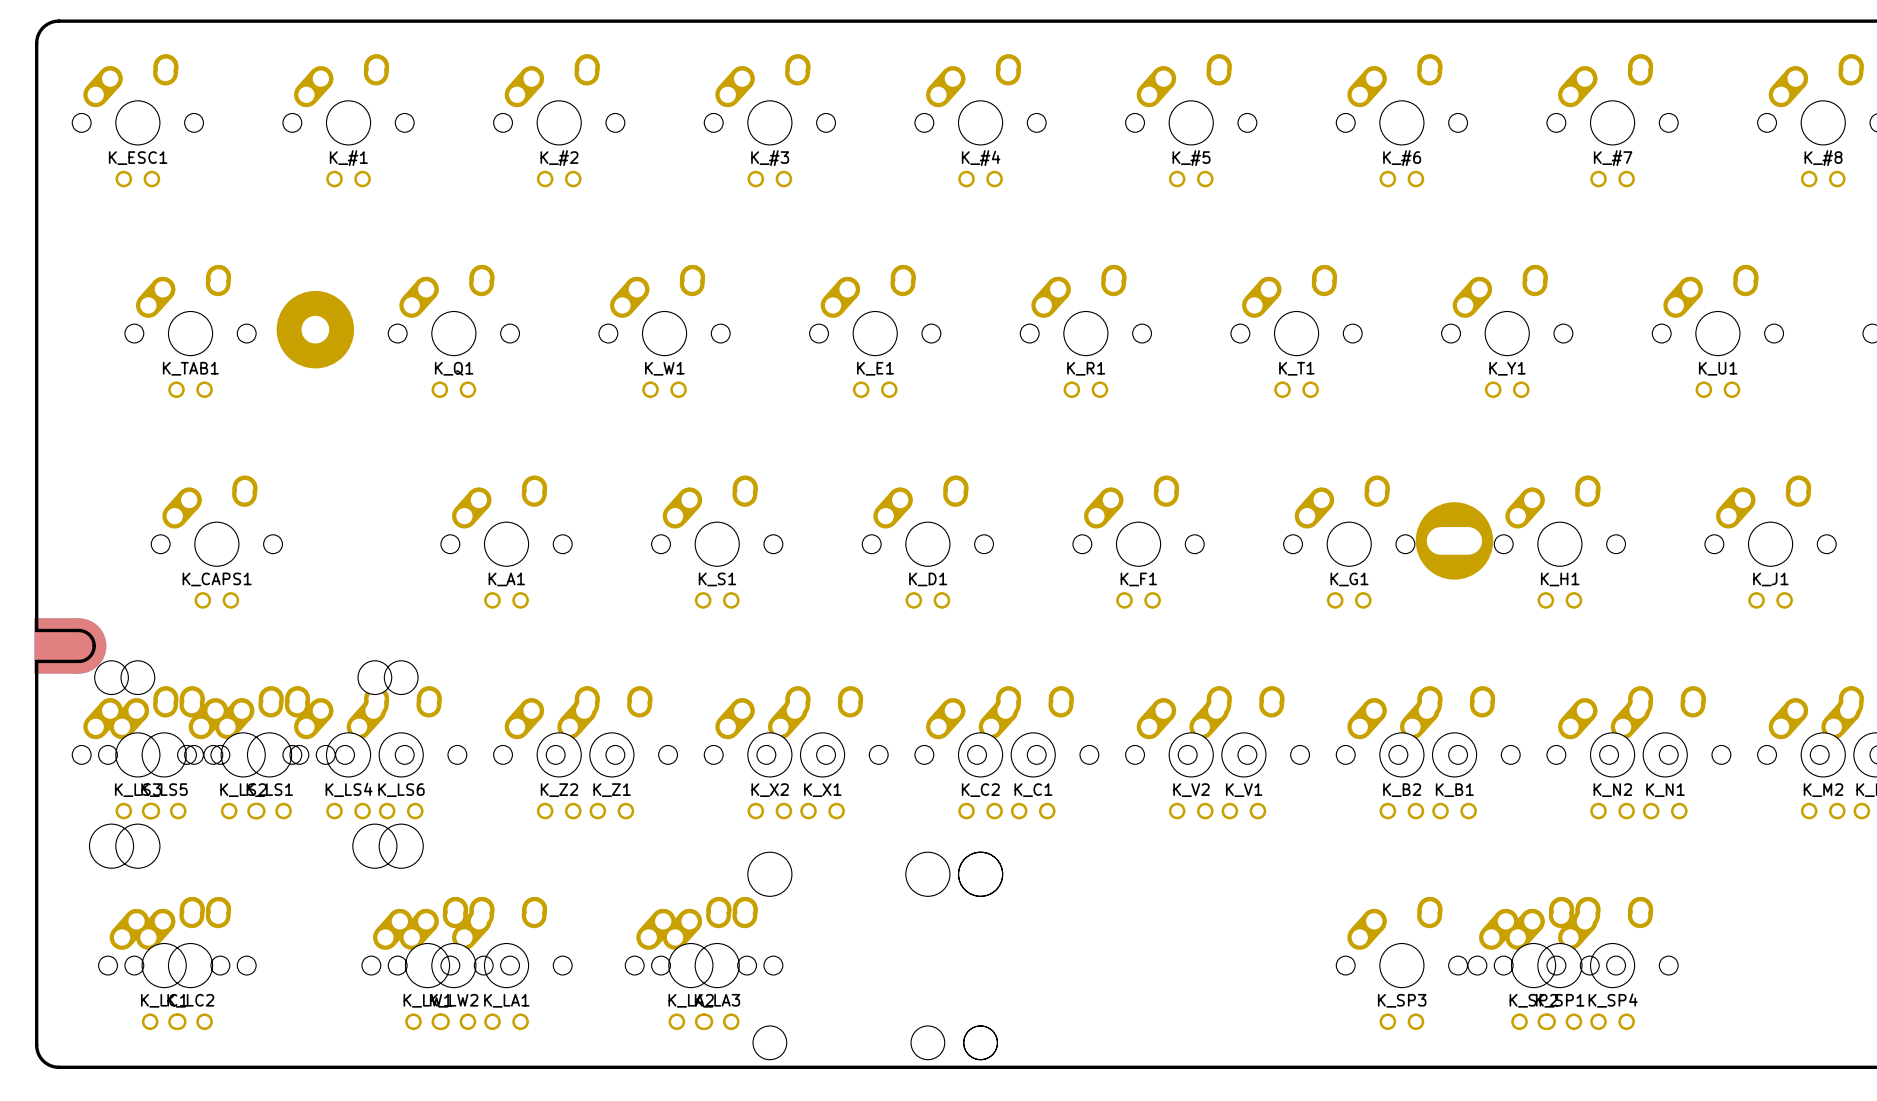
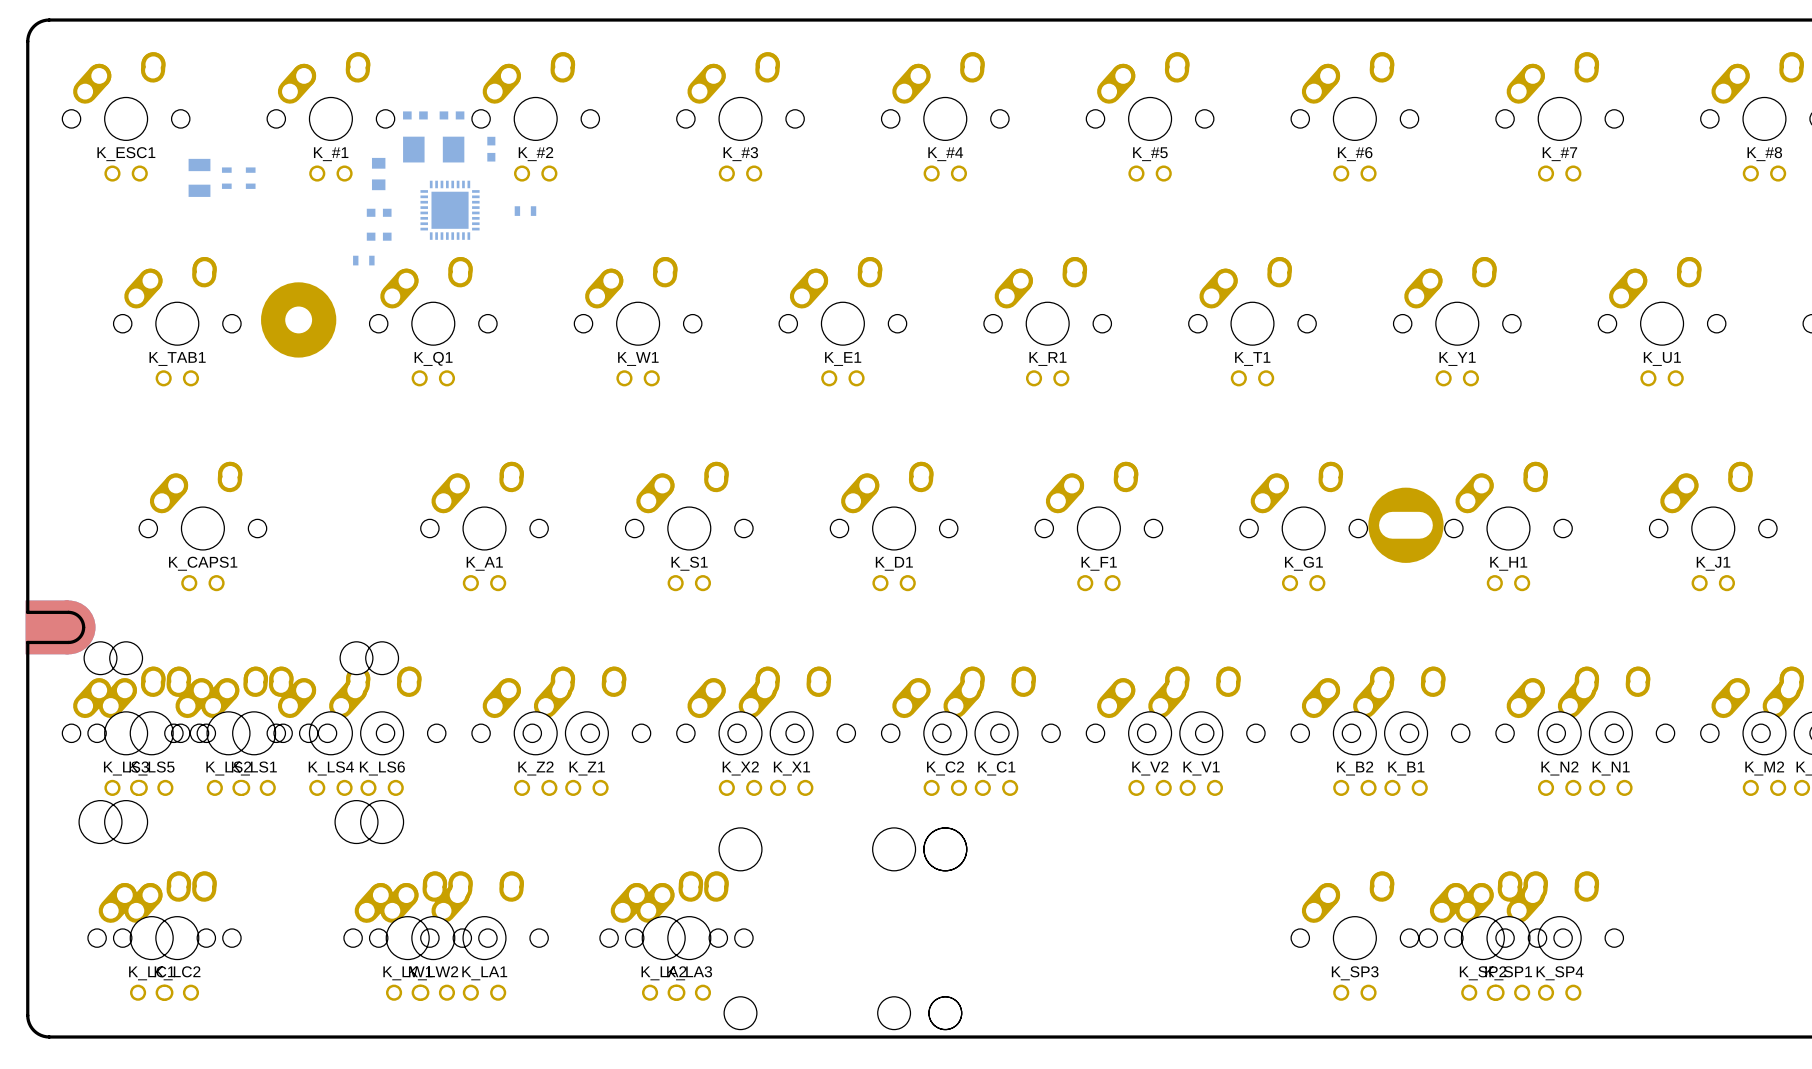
part: none -> (415, 115)
part: none -> (452, 115)
part: none -> (491, 149)
part: none -> (433, 149)
part: none -> (378, 174)
part: none -> (199, 177)
part: none -> (226, 178)
part: none -> (250, 178)
part: none -> (450, 210)
part: none -> (525, 211)
part: none -> (379, 212)
part: none -> (379, 236)
part: none -> (363, 260)

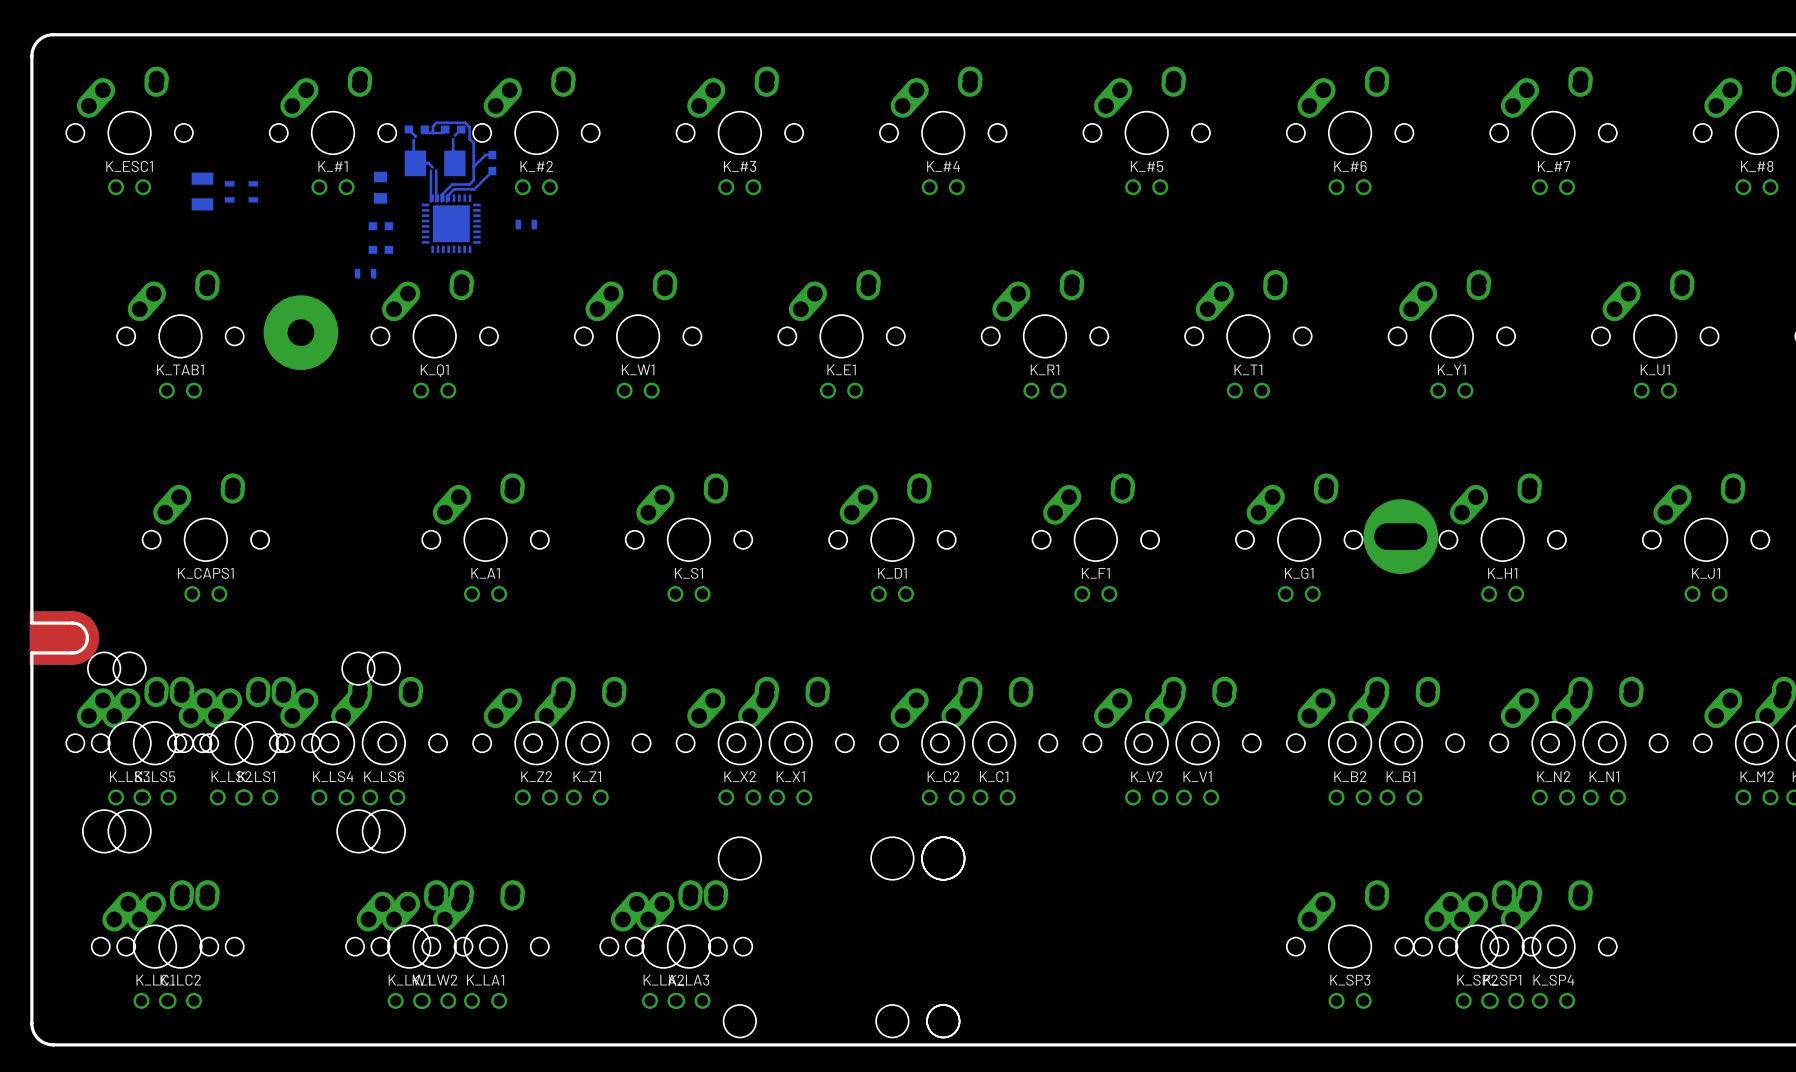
bottom track: none -> (408, 129) (415, 136)
bottom track: none -> (460, 129) (454, 135)
bottom track: none -> (422, 132) (443, 132)
bottom track: none -> (433, 132) (433, 126) (436, 122) (465, 122) (469, 127) (469, 138) (473, 143) (473, 180) (469, 184) (452, 184) (441, 195) (441, 201)
bottom track: none -> (413, 139) (413, 166)
bottom track: none -> (453, 139) (453, 166)
bottom track: none -> (492, 155) (485, 155) (473, 166)
bottom track: none -> (415, 163) (428, 163) (432, 167)
bottom track: none -> (430, 170) (430, 201)
bottom track: none -> (436, 170) (436, 201)
bottom track: none -> (492, 171) (474, 189) (454, 189) (446, 196) (446, 201)

